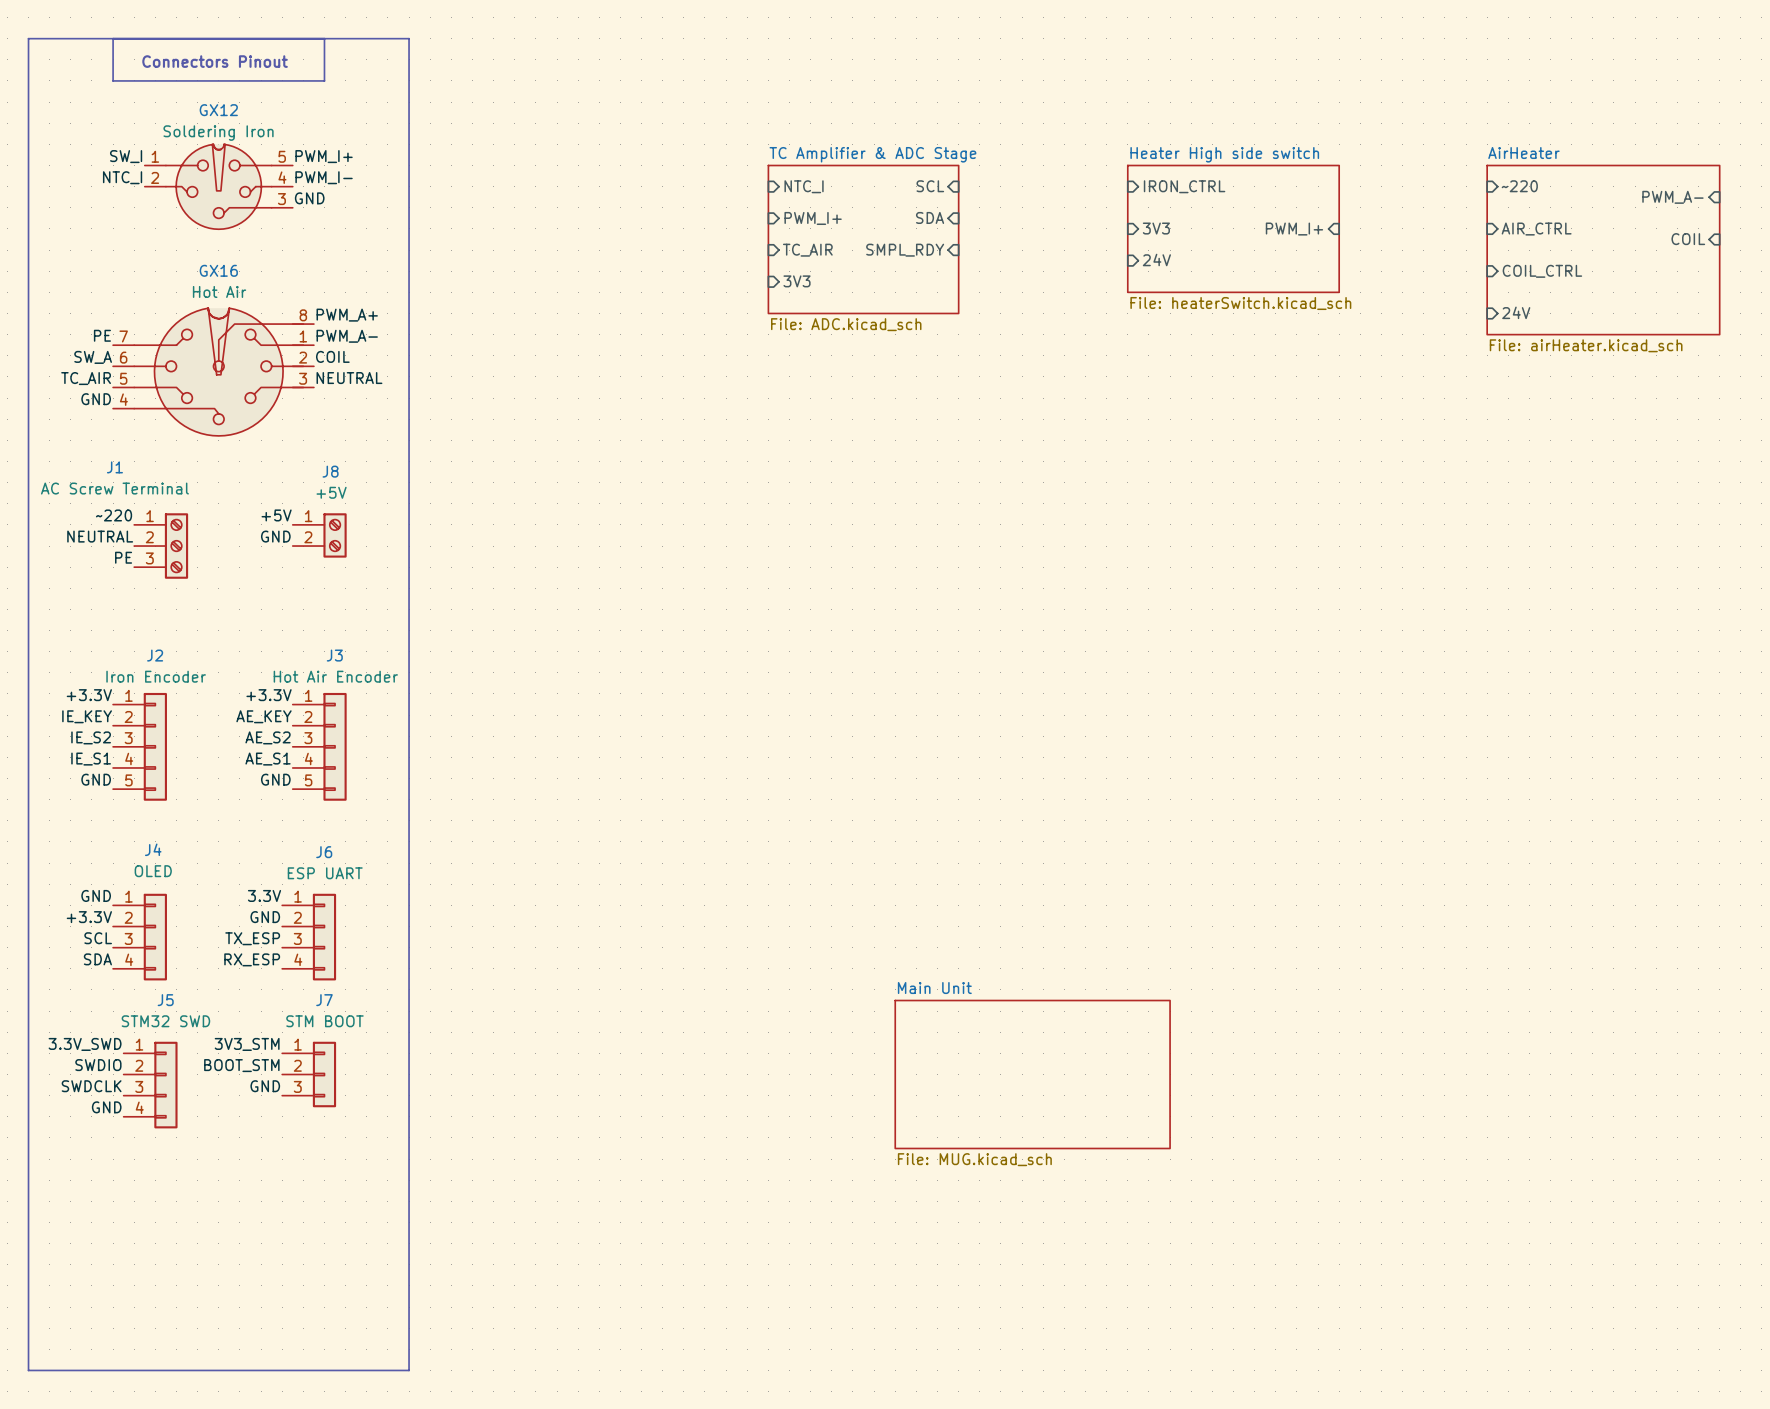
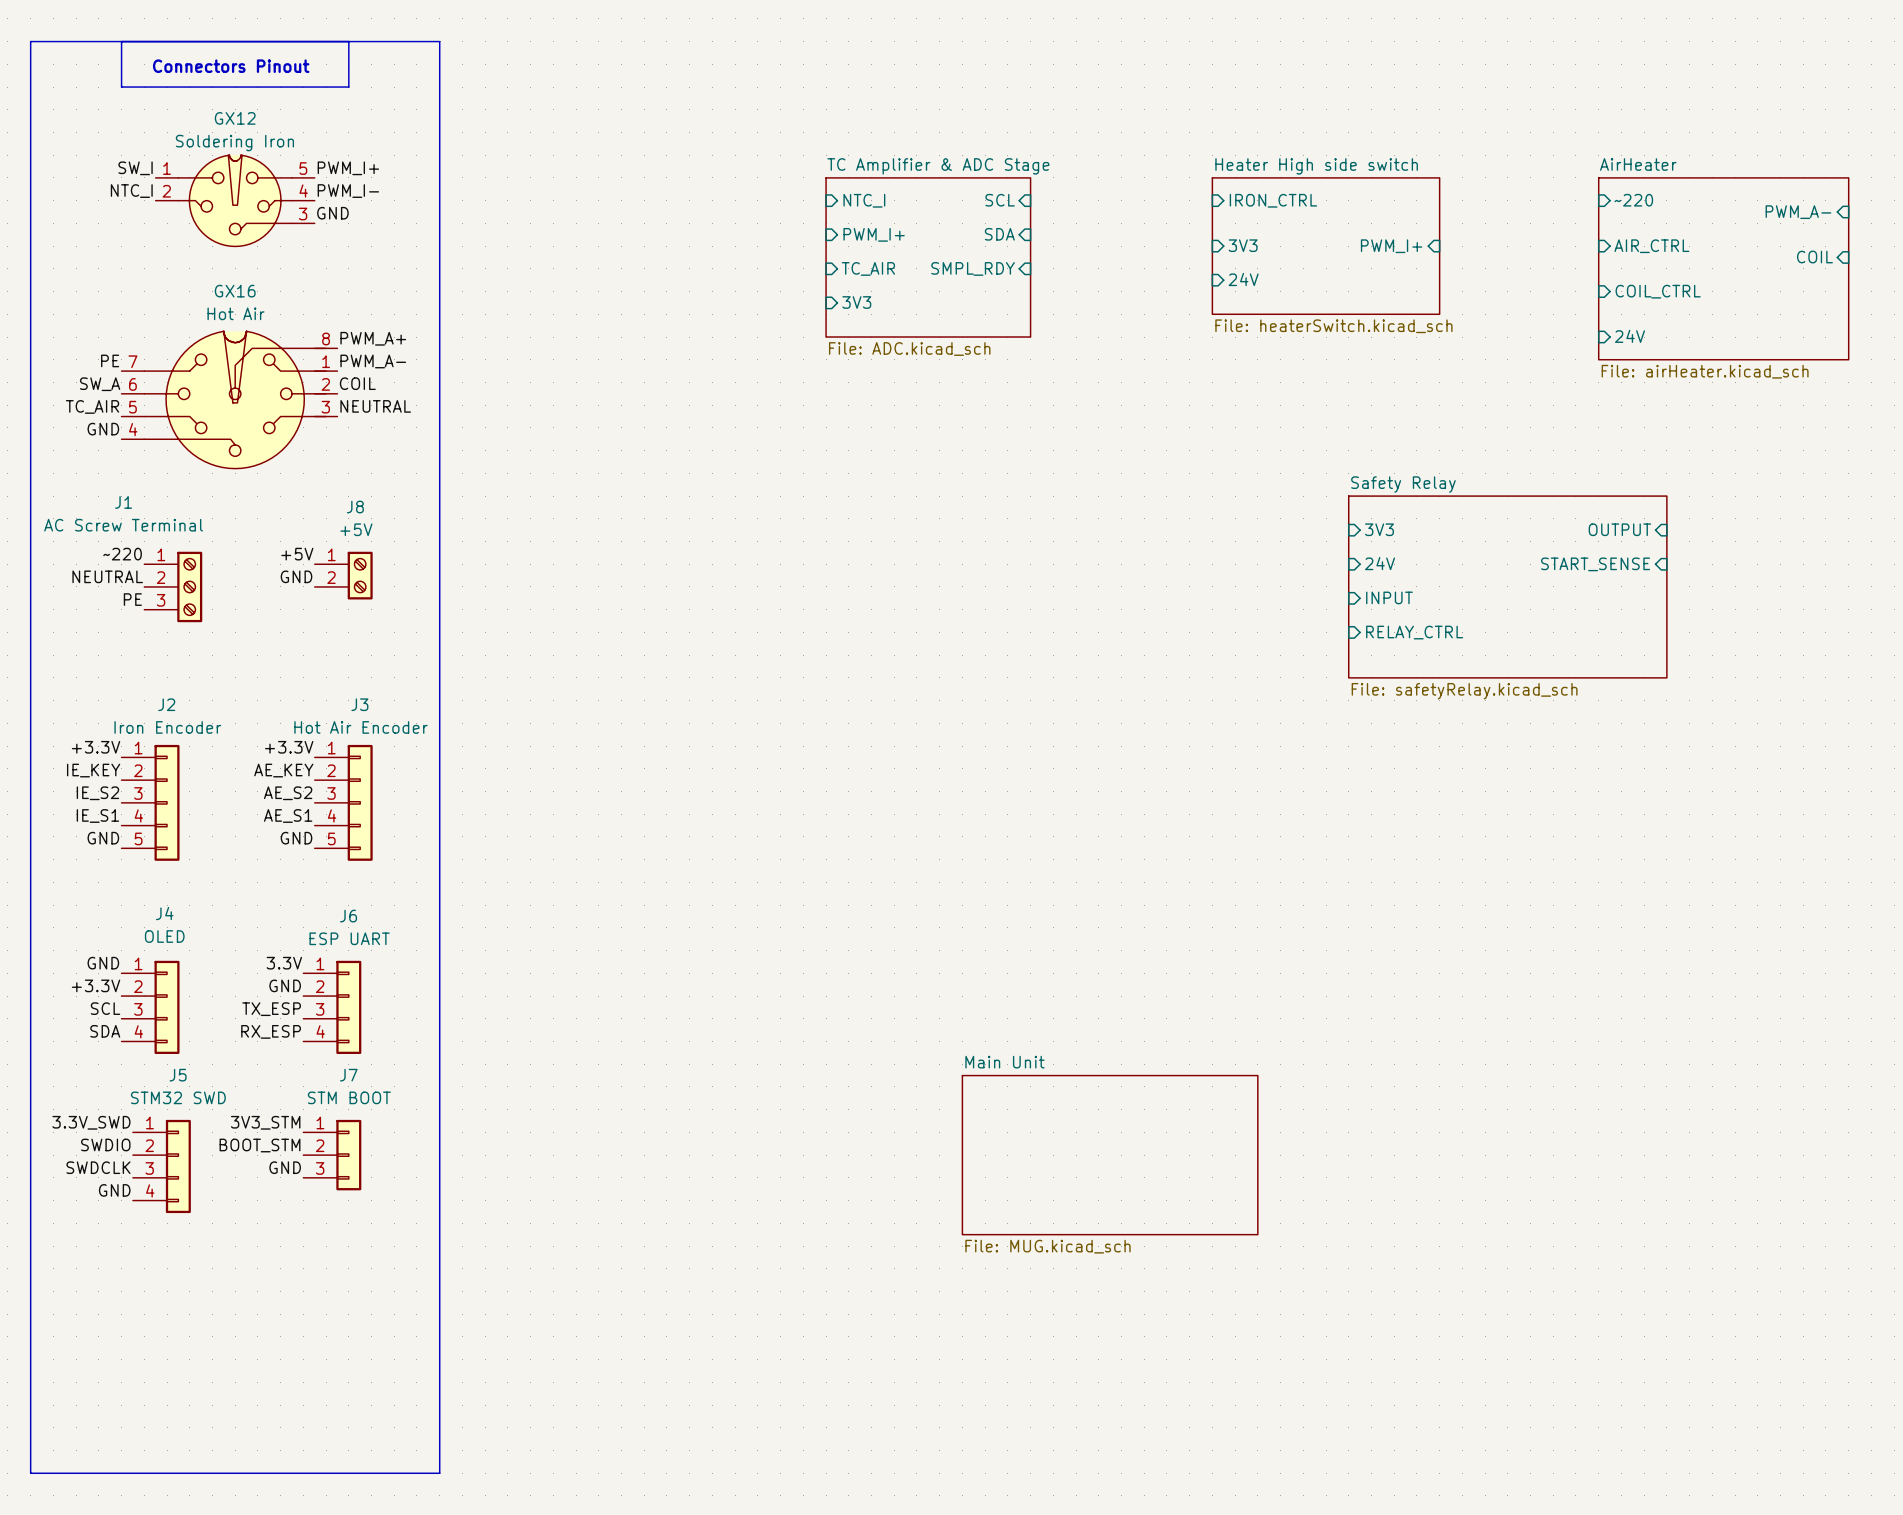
sheet pin: none -> 3V3 (1379, 529)
sheet pin: none -> OUTPUT (1619, 529)
sheet pin: none -> 24V (1380, 563)
sheet pin: none -> START_SENSE (1595, 564)
sheet Safety Relay: none -> File: safetyRelay.kicad_sch (1507, 586)
sheet pin: none -> INPUT (1389, 597)
sheet pin: none -> RELAY_CTRL (1414, 632)

